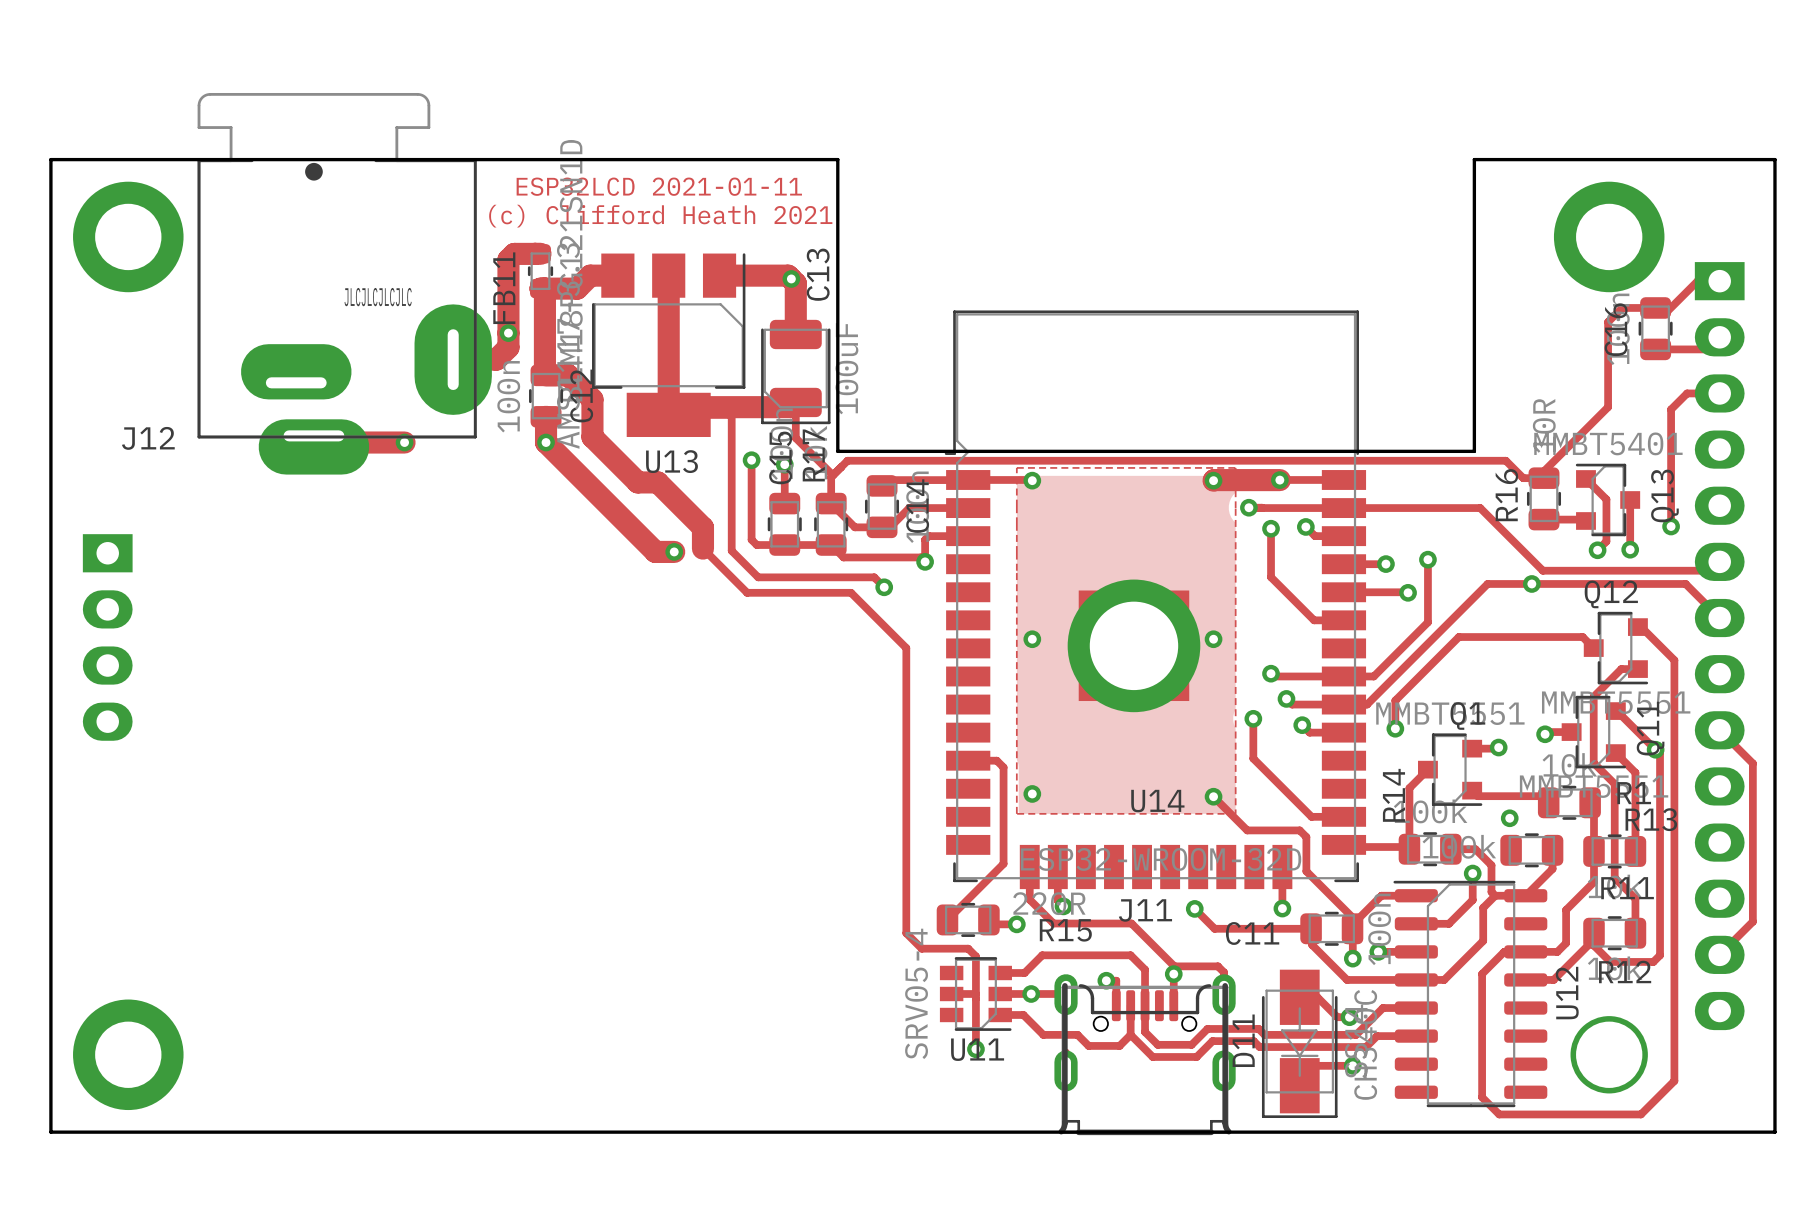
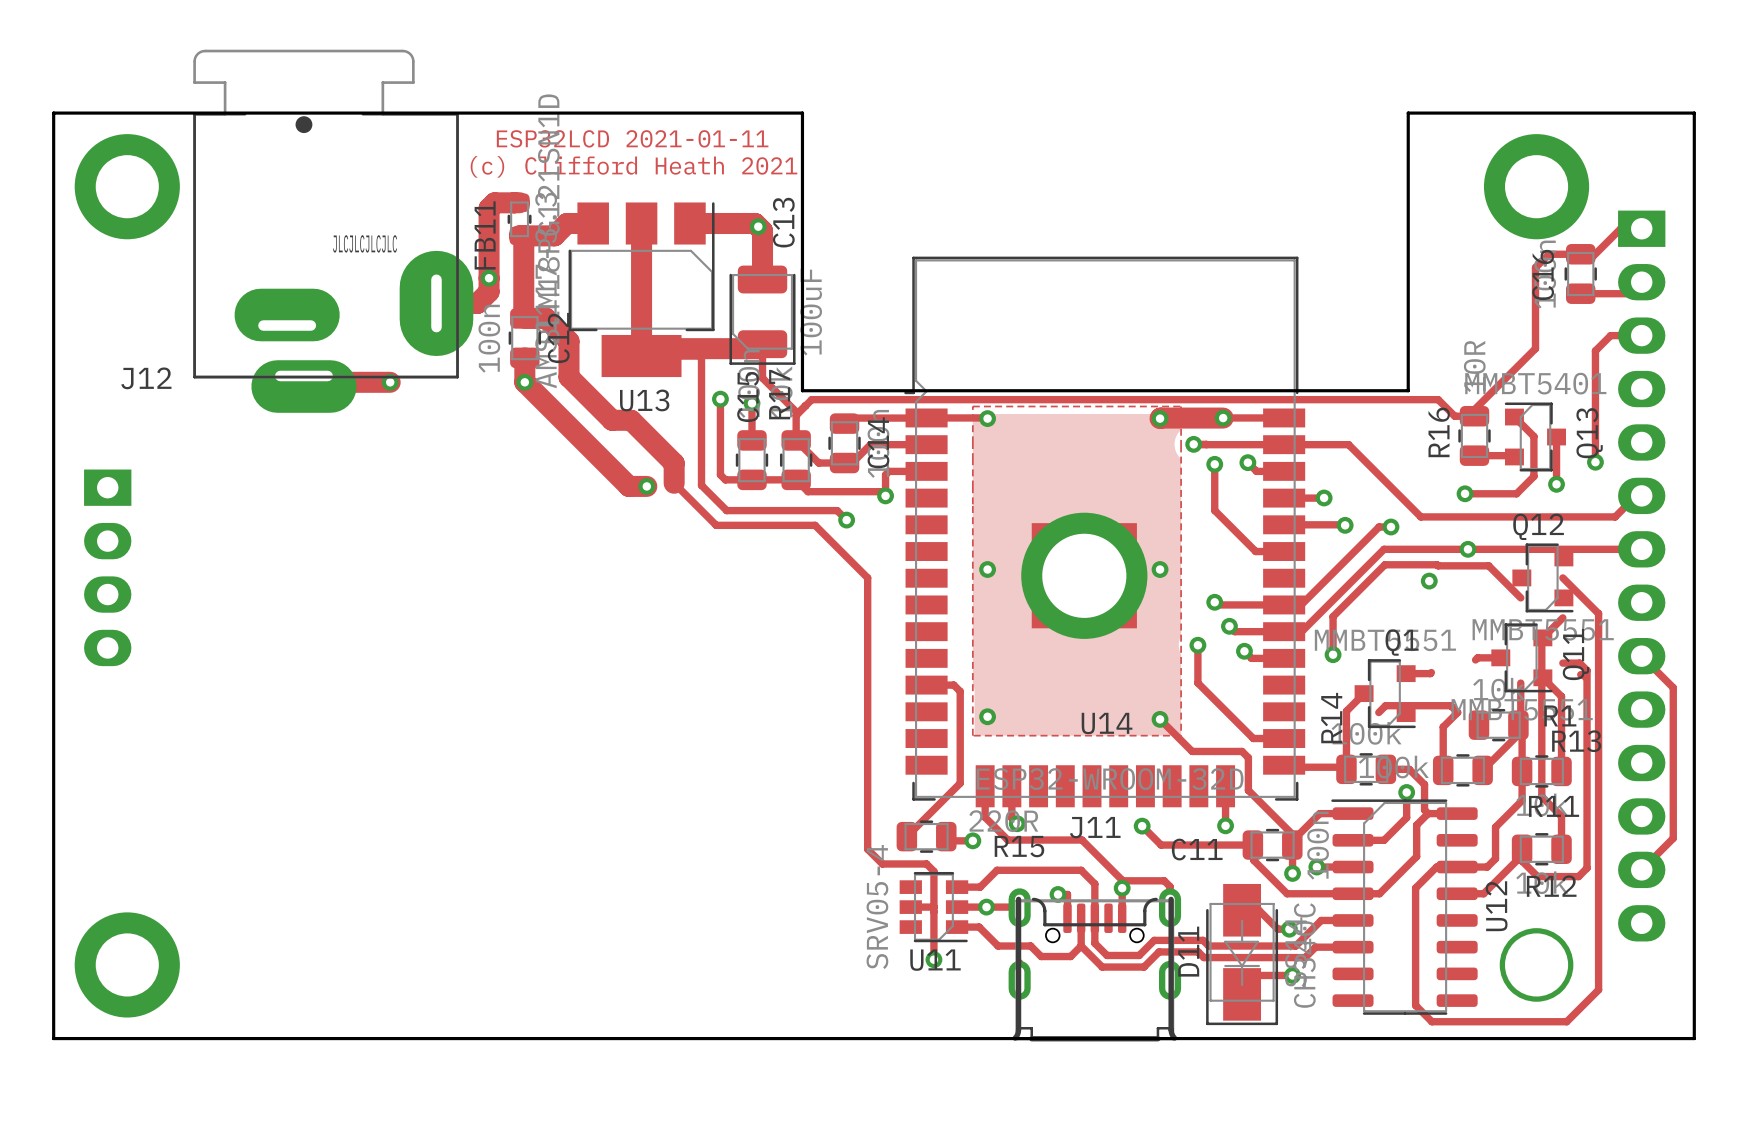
track: (1411, 508) (1480, 508) (1542, 570) (1705, 570) -> none
track: none -> (1525, 484) (1516, 493) (1465, 493)
via: (1597, 550) -> none
track: (1427, 559) (1427, 622) (1373, 676) (1361, 676) -> (1390, 527) (1379, 527) (1301, 604)
via: (1427, 559) -> none
via: none -> (1465, 493)
track: (1487, 583) (1367, 704) (1362, 704) -> (1420, 516) (1348, 444)
via: (1531, 583) -> none
track: (1685, 583) (1719, 618) -> (1609, 516) (1615, 516) (1627, 504)
via: none -> (1390, 527)
via: none -> (1467, 549)
track: none -> (1641, 549) (1384, 549) (1301, 631)
track: (1637, 627) (1641, 627) (1674, 660) (1674, 685) -> (1562, 577) (1598, 613)
track: (1593, 648) (1582, 637) (1458, 637) (1395, 700) -> (1520, 597) (1488, 565) (1384, 564) (1333, 616) (1333, 627)
via: none -> (1429, 581)
track: (1637, 669) (1621, 669) (1593, 696) (1593, 763) (1614, 784) -> (1562, 617) (1541, 638) (1541, 707)
track: (1615, 711) (1657, 751) (1660, 751) (1660, 955) -> (1562, 663) (1579, 663) (1587, 670) (1587, 868) (1584, 870)
via: (1545, 734) -> none
via: (1498, 747) -> none
via: (1655, 749) -> none
track: none -> (1378, 712) (1385, 705) (1450, 705) (1457, 712) (1443, 727) (1443, 770)
track: (1472, 790) (1477, 796) (1542, 796) (1548, 802) -> none
via: (1509, 818) -> none
track: (1552, 850) (1552, 868) (1525, 895) -> (1482, 770) (1520, 732) (1520, 683)

